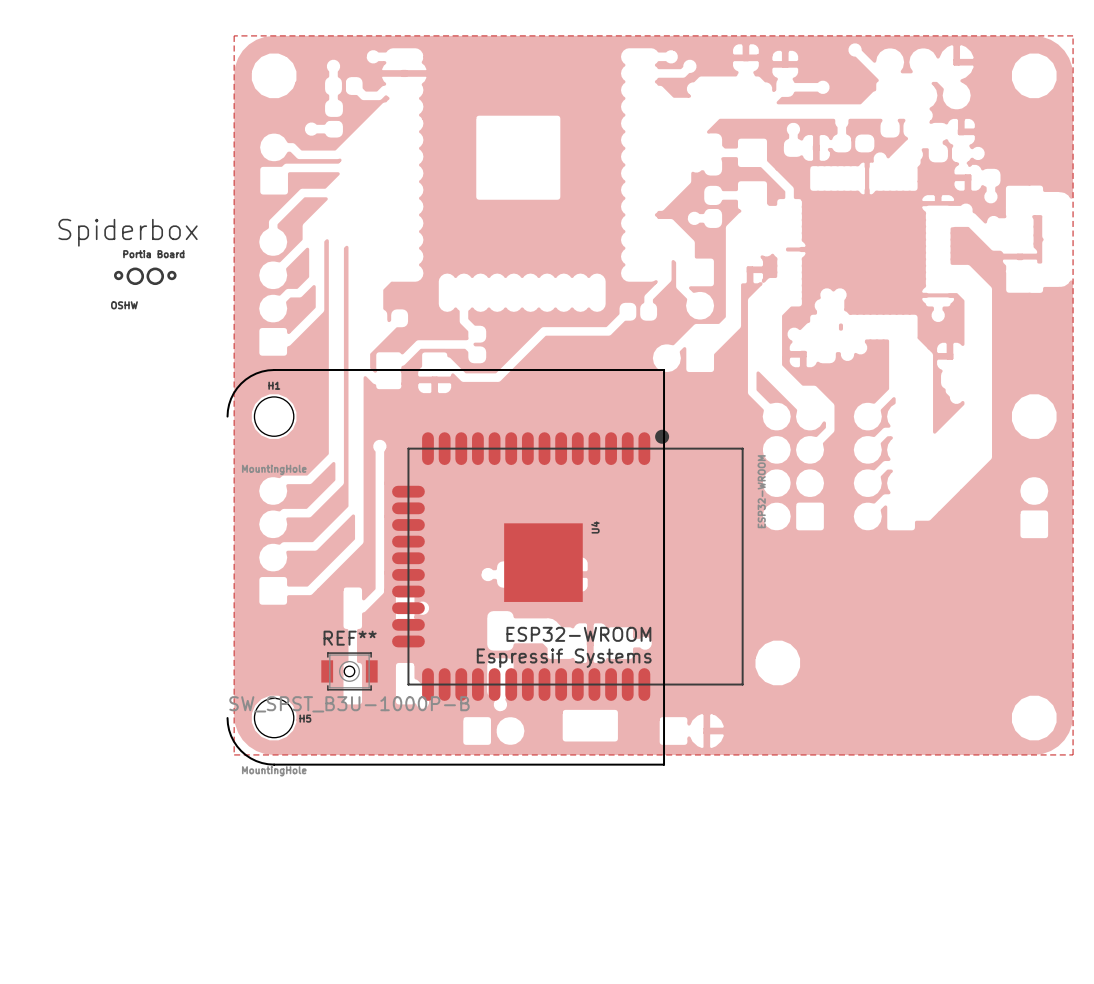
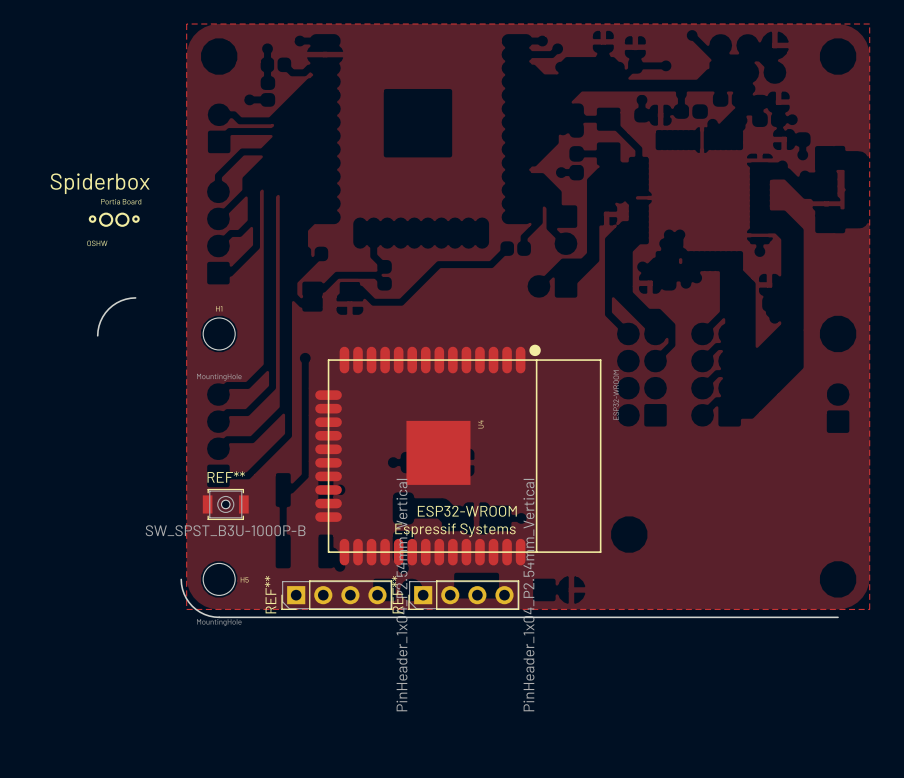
board edge: none -> (135, 297) (121, 300) (108, 309) (100, 321) (97, 335)
board edge: (227, 416) (231, 398) (237, 388) (250, 376) (268, 370) (664, 369) (664, 764) -> (838, 617) (536, 617)
REF** position: (349, 671) -> (225, 504)
REF**: none -> PinHeader_1x04_P2.54mm_Vertical (336, 595)
REF**: none -> PinHeader_1x04_P2.54mm_Vertical (463, 595)

